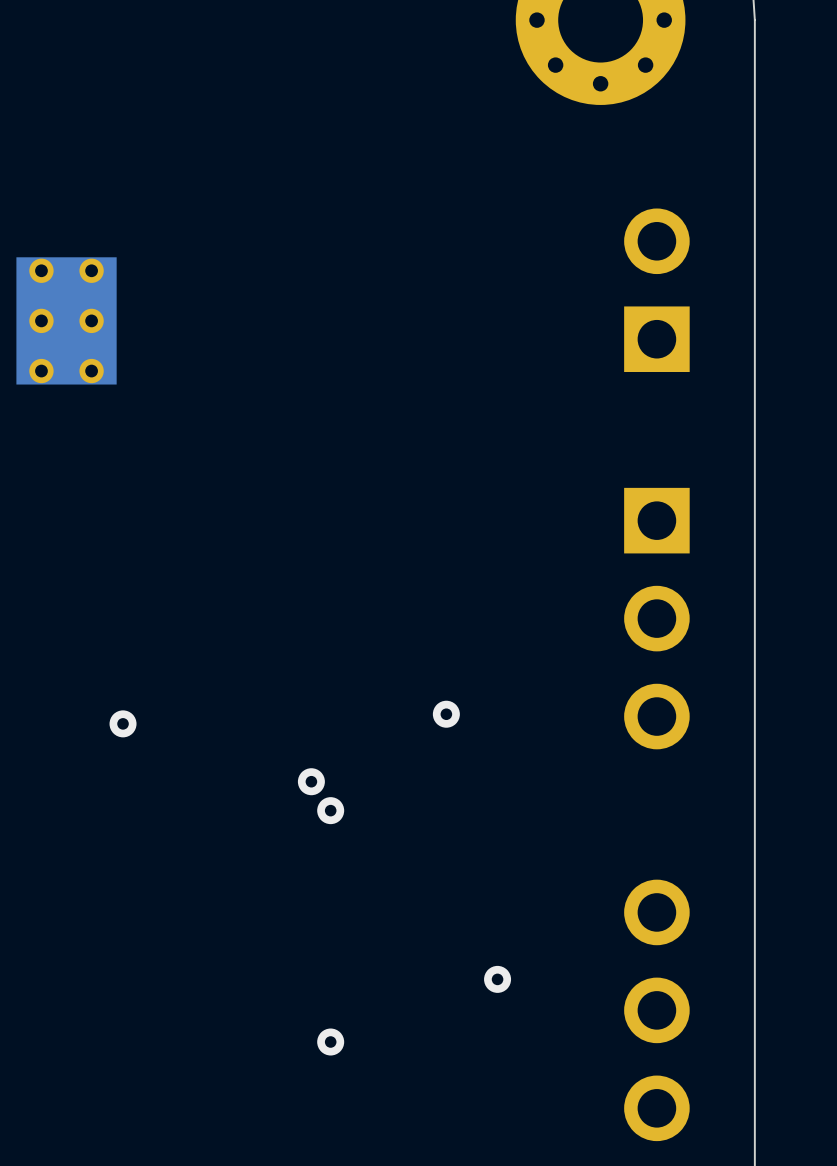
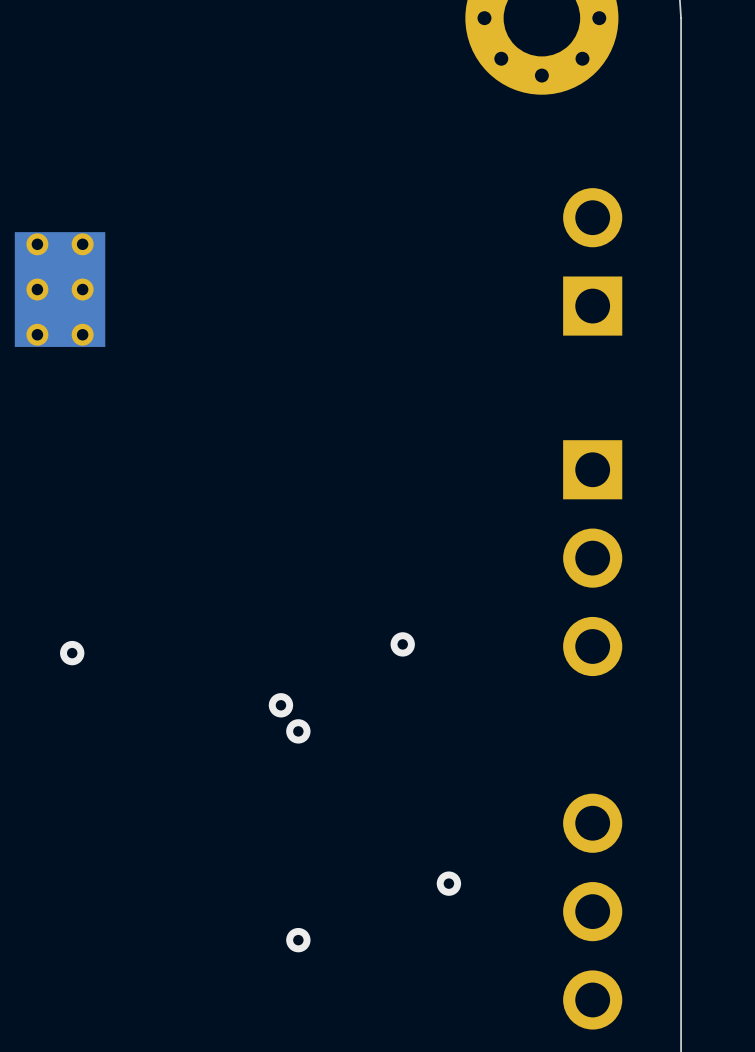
via position: (123, 723) -> (72, 653)

